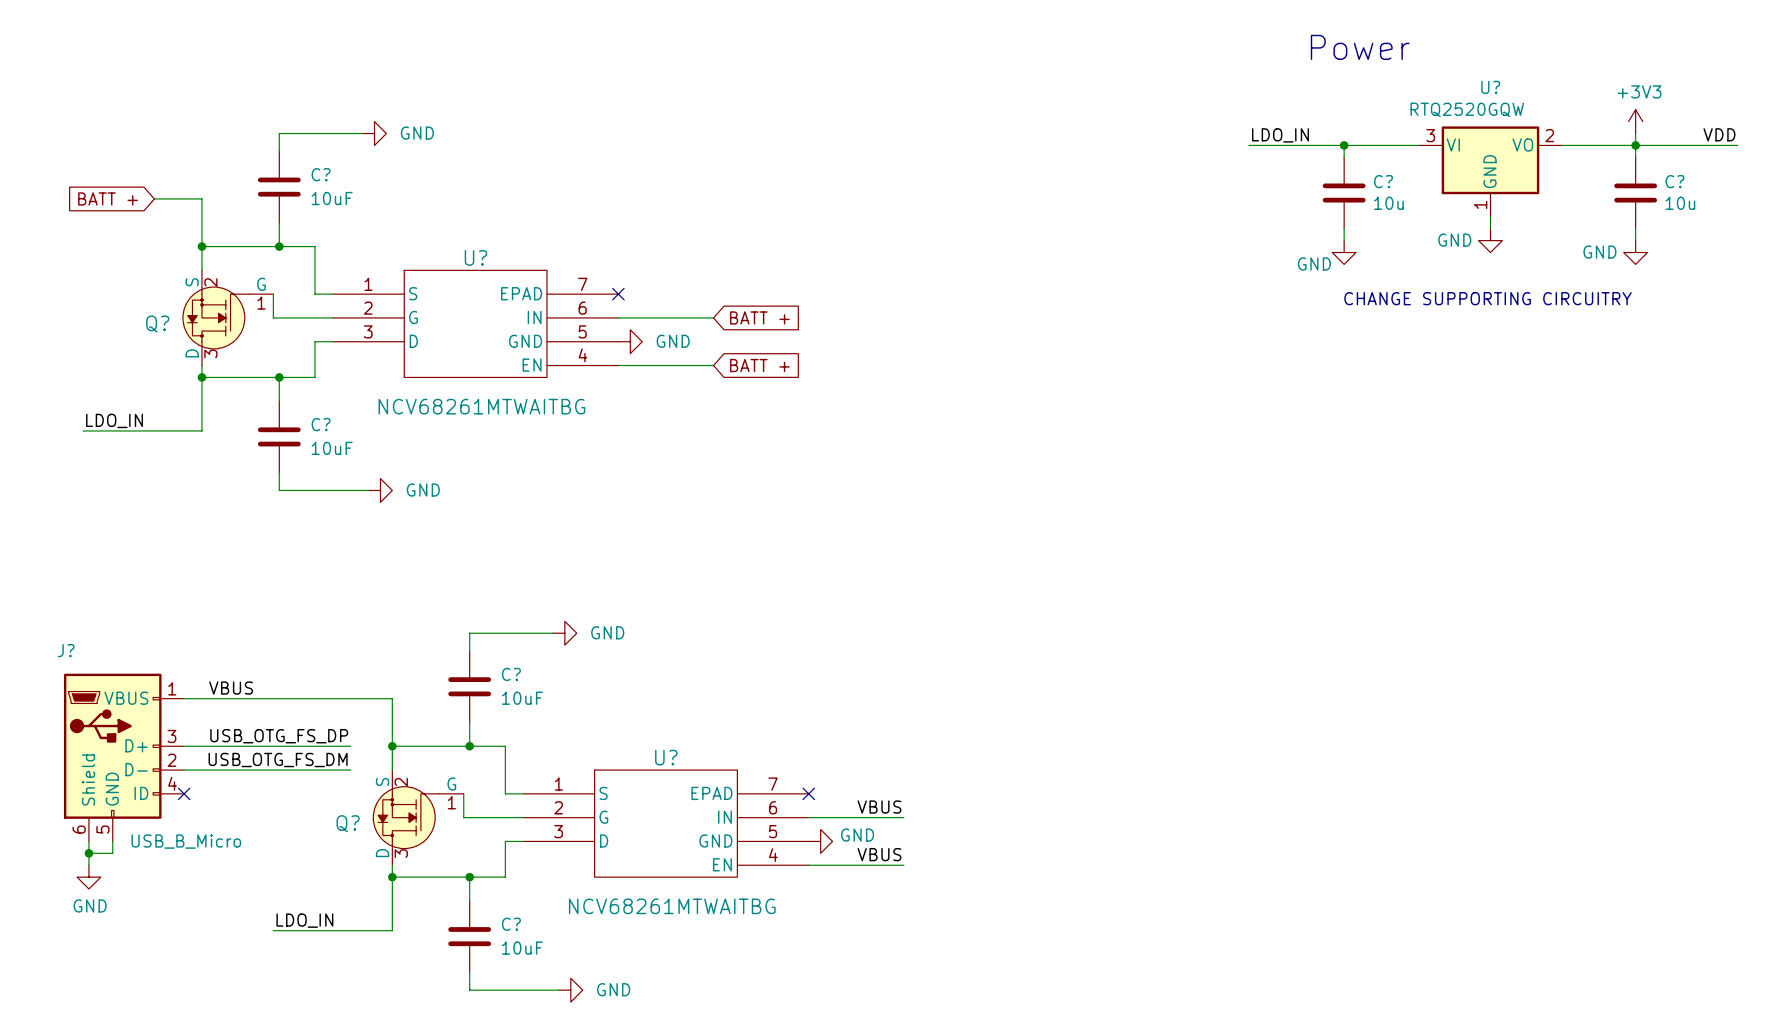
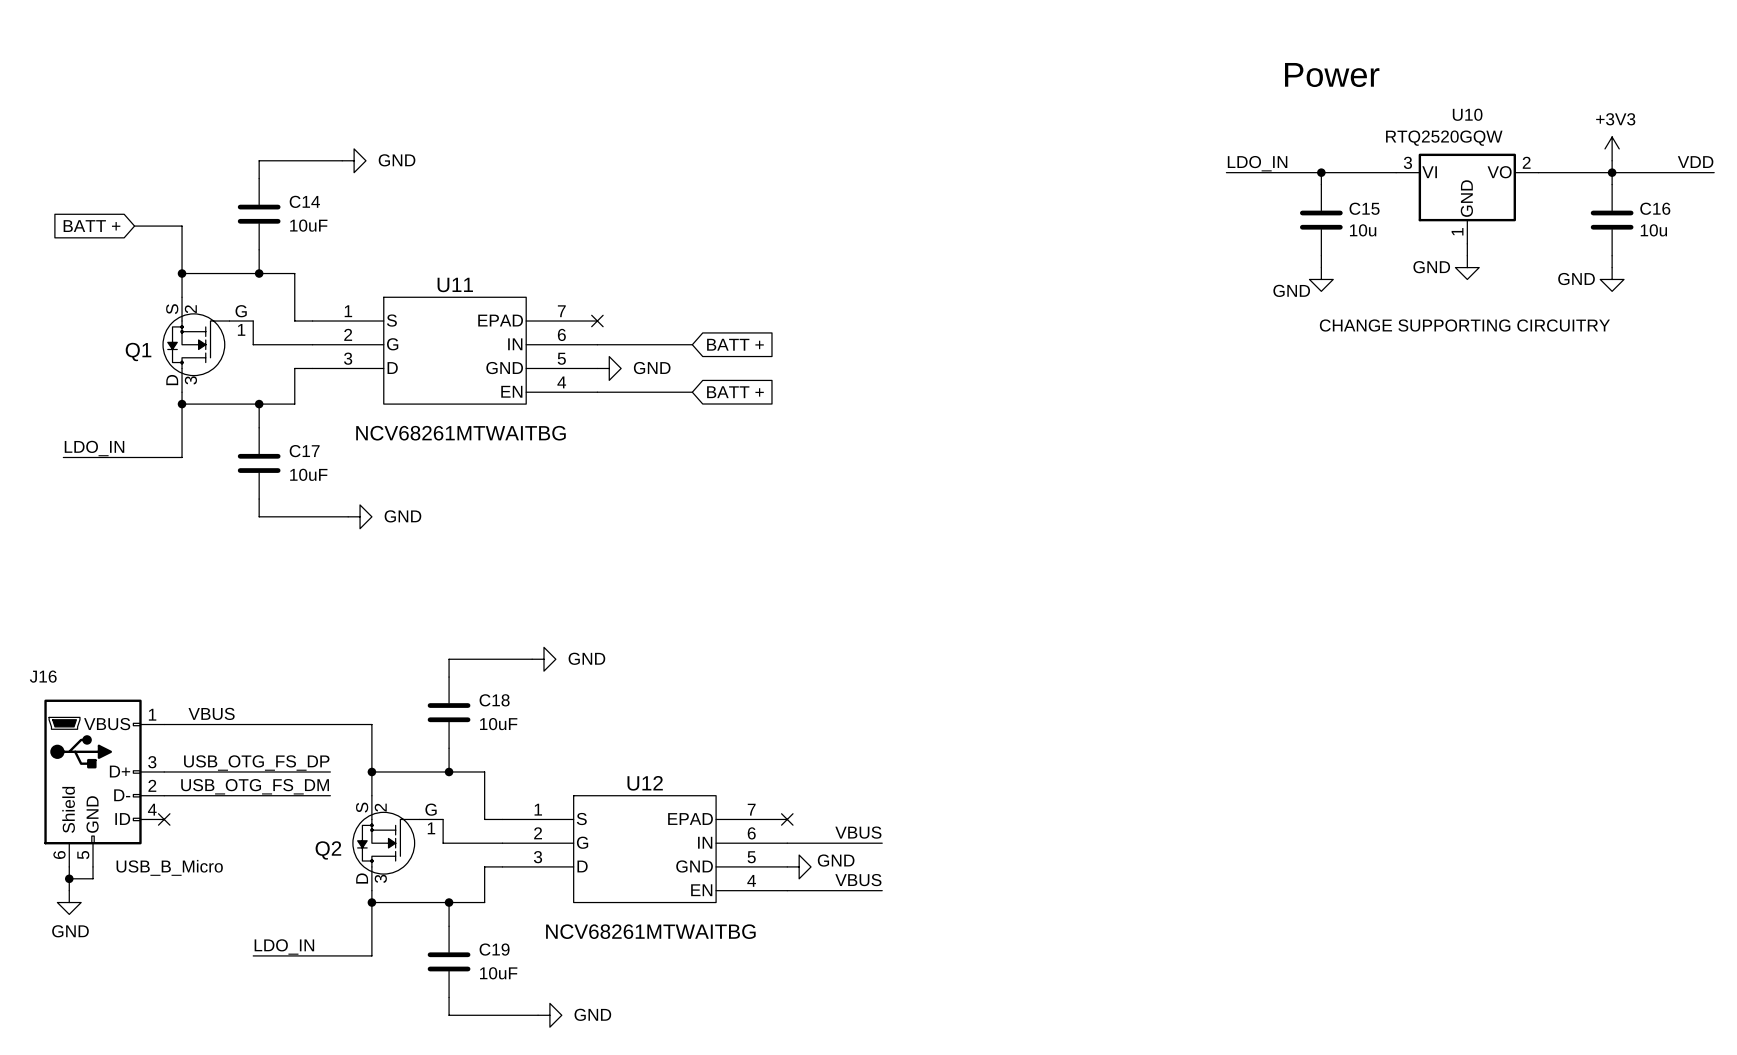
U? name: U? (1490, 87) -> U10 (1467, 114)
C? name: C? (321, 174) -> C14 (304, 201)
C? name: C? (1383, 181) -> C15 (1364, 208)
C? name: C? (1674, 181) -> C16 (1655, 208)
U? name: U? (475, 257) -> U11 (455, 284)
Q? name: Q? (157, 324) -> Q1 (138, 351)
C? name: C? (321, 424) -> C17 (304, 451)
J? name: J? (66, 650) -> J16 (43, 676)
C? name: C? (511, 674) -> C18 (494, 700)
U? name: U? (666, 757) -> U12 (645, 783)
Q? name: Q? (348, 823) -> Q2 (328, 850)
C? name: C? (511, 924) -> C19 (494, 949)

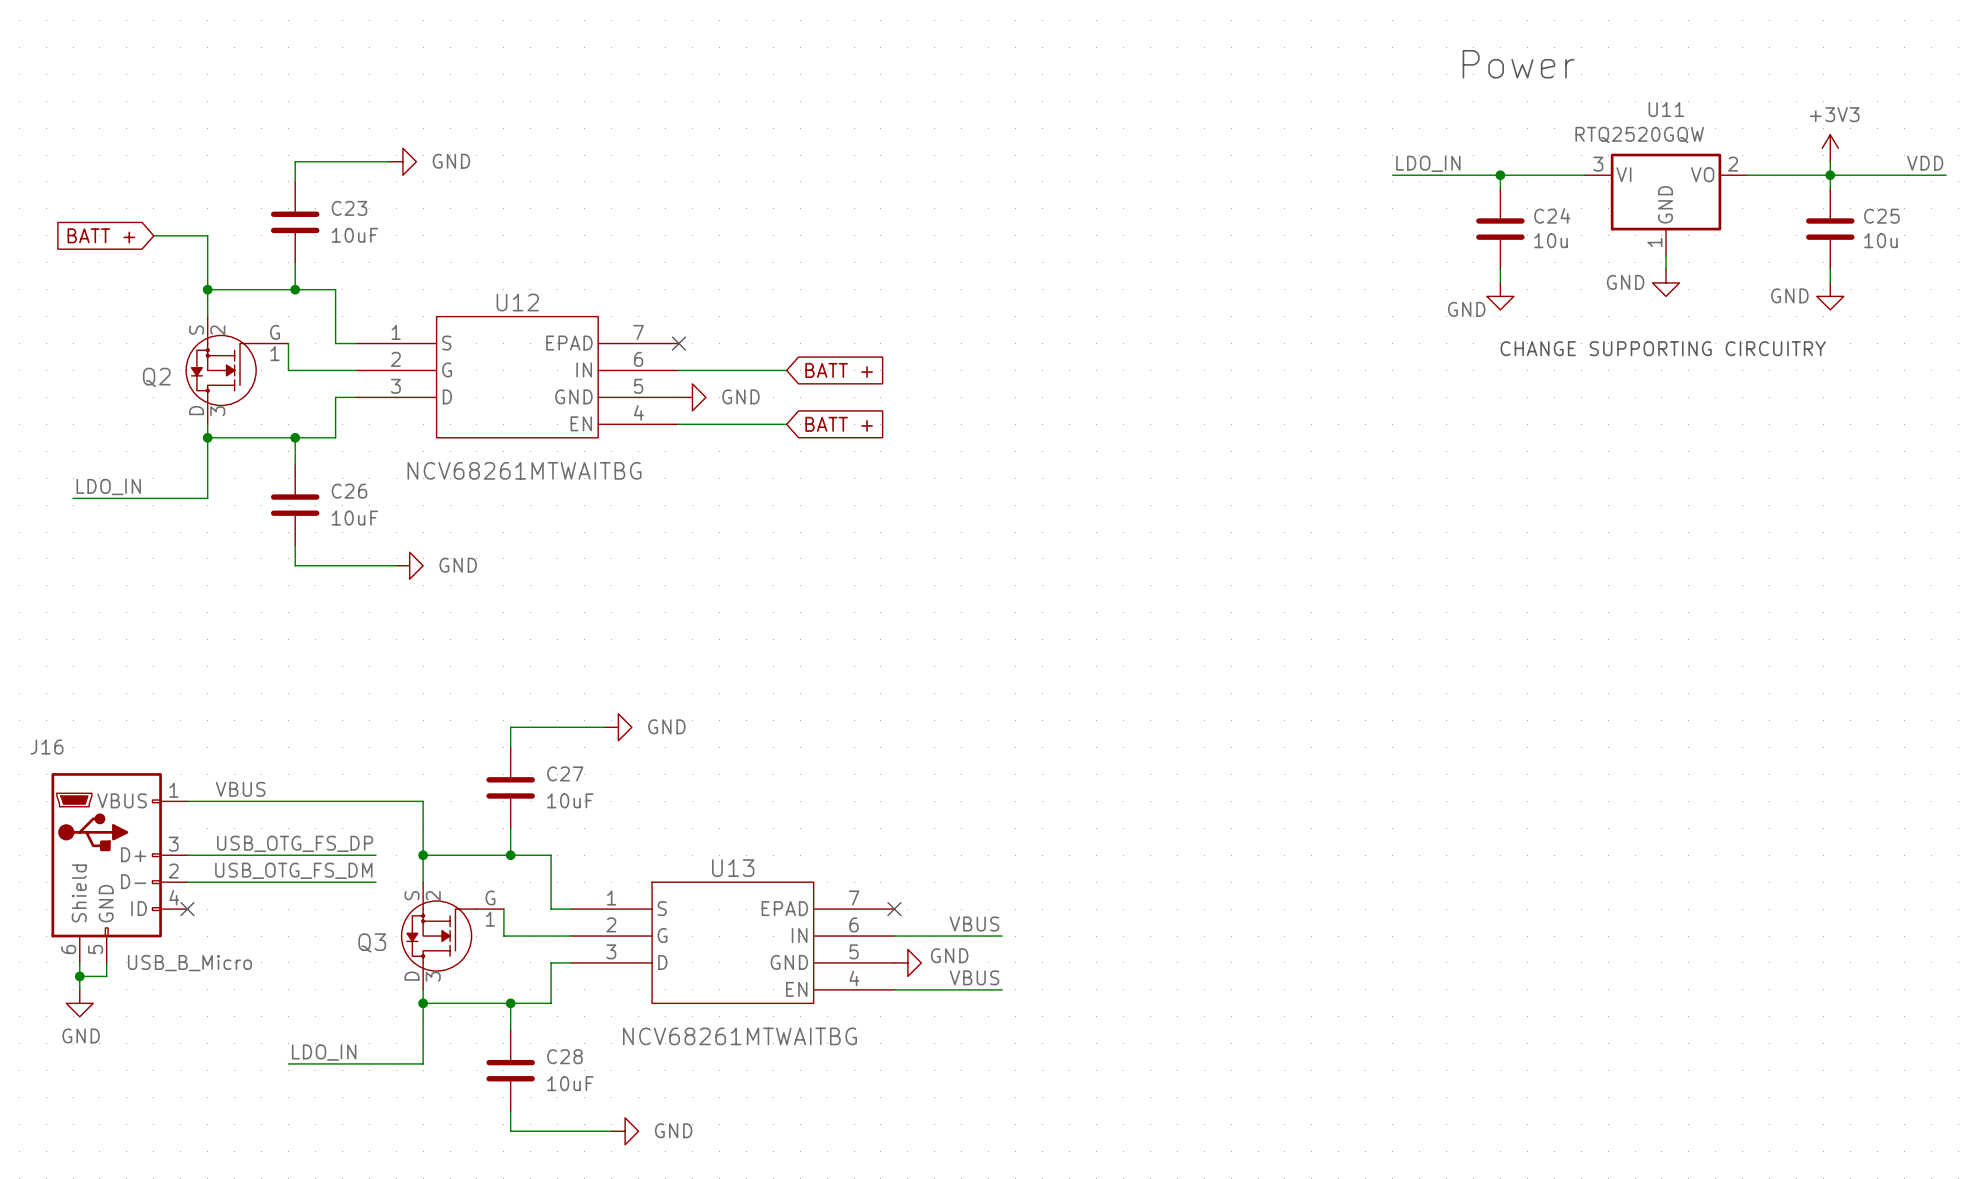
U10 name: U10 (1467, 114) -> U11 (1666, 109)
C14 name: C14 (304, 201) -> C23 (349, 208)
C15 name: C15 (1364, 208) -> C24 (1552, 215)
C16 name: C16 (1655, 208) -> C25 (1881, 216)
U11 name: U11 (455, 284) -> U12 (517, 302)
Q1 name: Q1 (138, 351) -> Q2 (156, 377)
C17 name: C17 (304, 451) -> C26 (349, 491)
C18 name: C18 (494, 700) -> C27 (565, 773)
U12 name: U12 (645, 783) -> U13 (733, 868)
Q2 name: Q2 (328, 850) -> Q3 (372, 942)
C19 name: C19 (494, 949) -> C28 (564, 1056)

